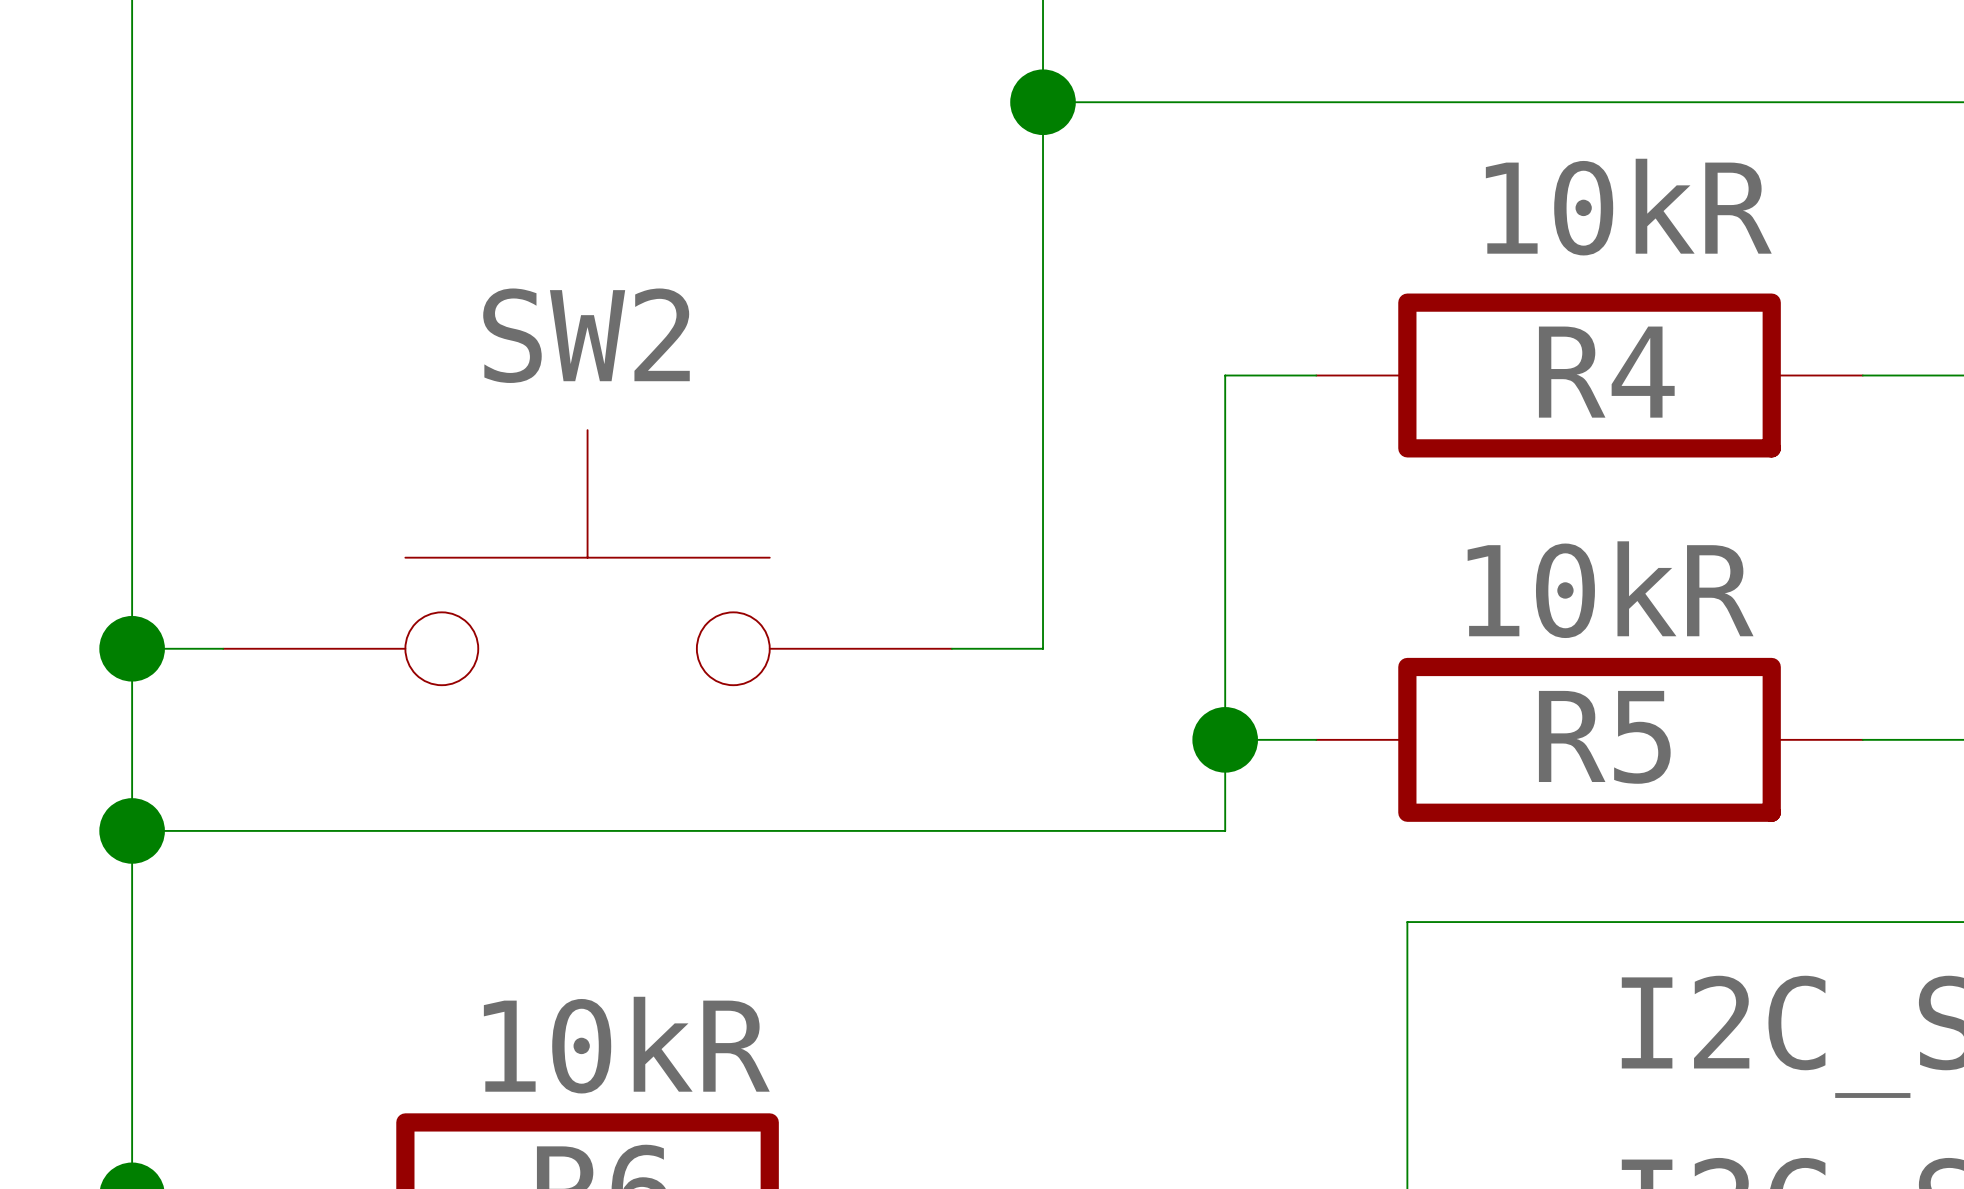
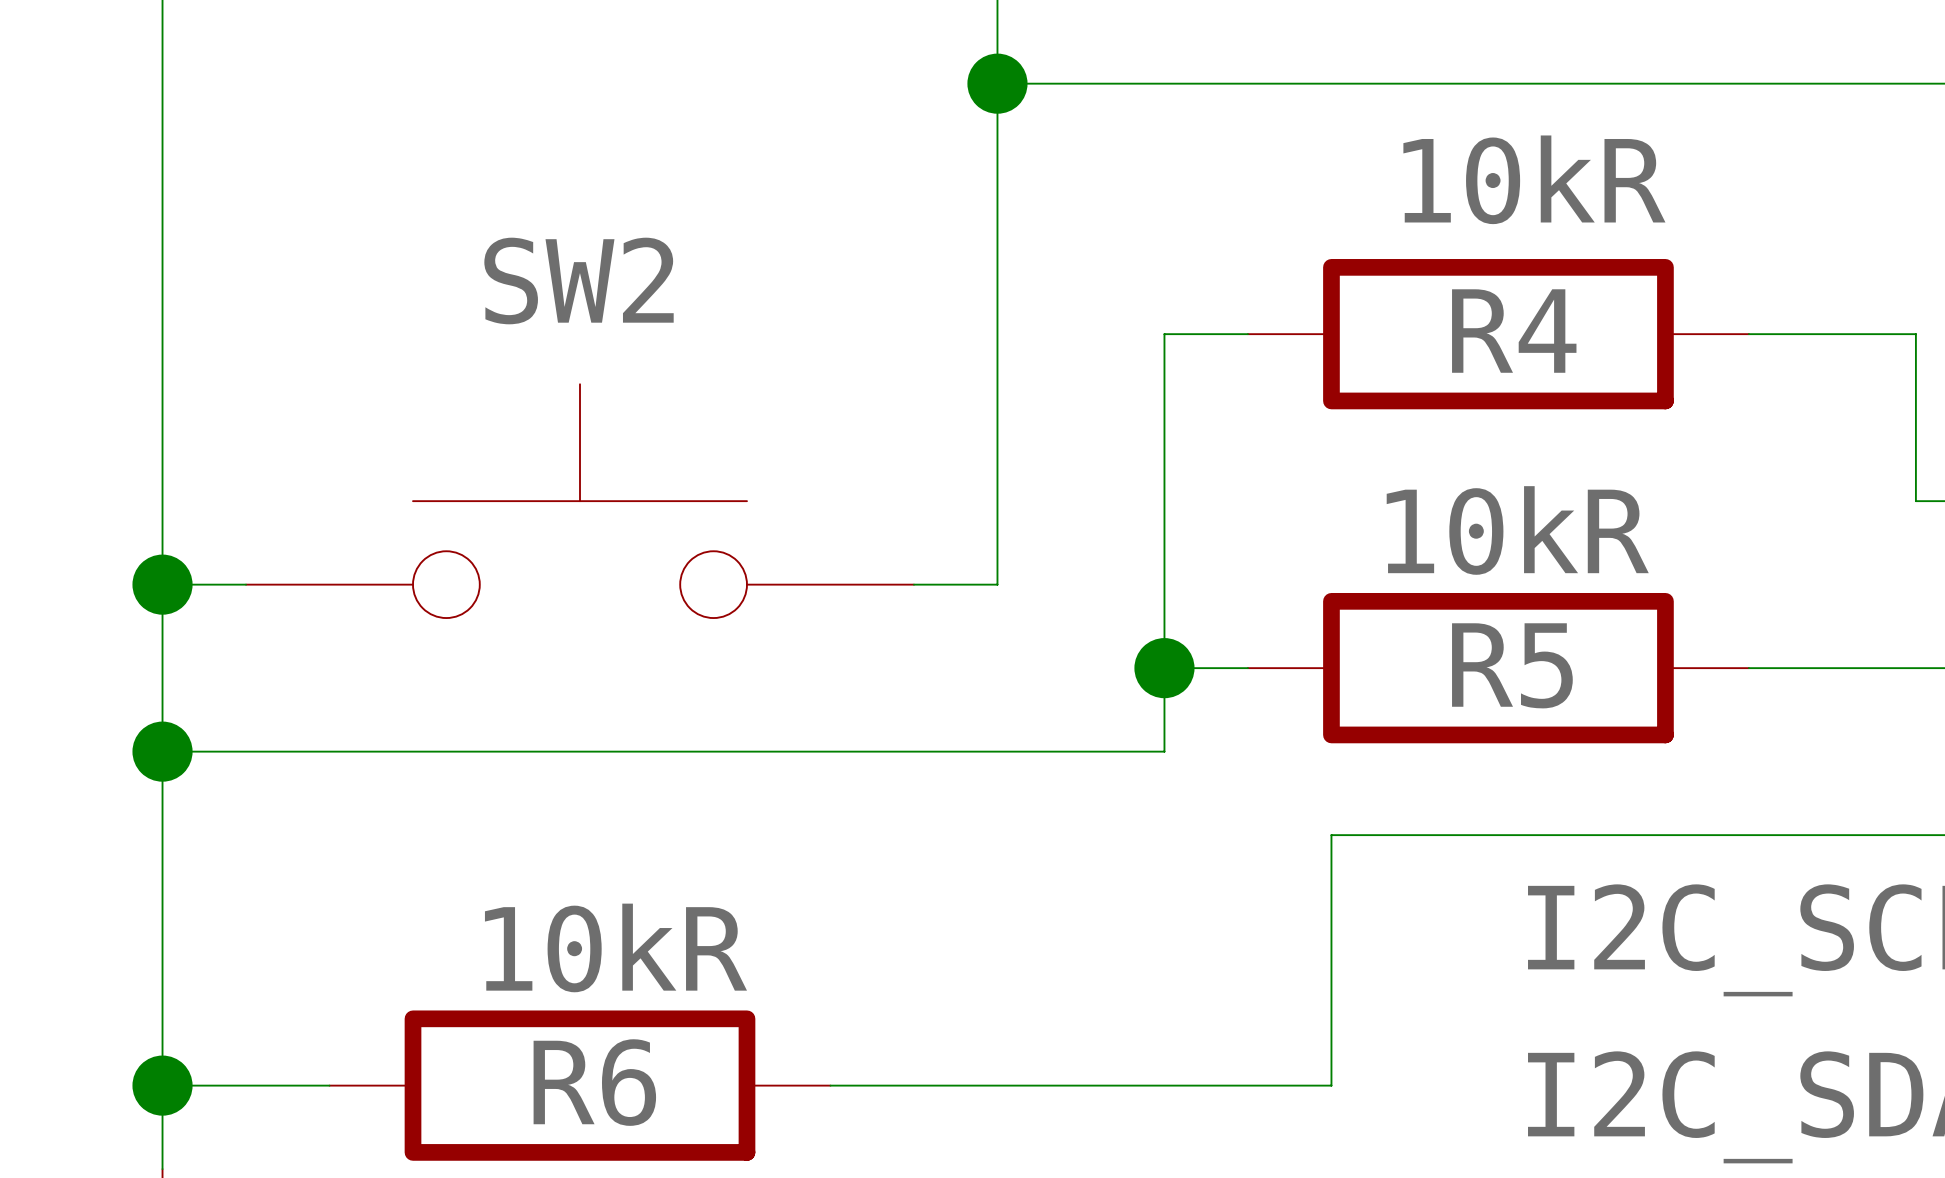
SW2 name position: SW2 (586, 335) -> SW2 (579, 281)

